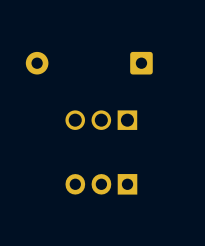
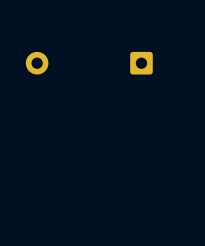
part: (101, 120) -> none
part: (101, 184) -> none

